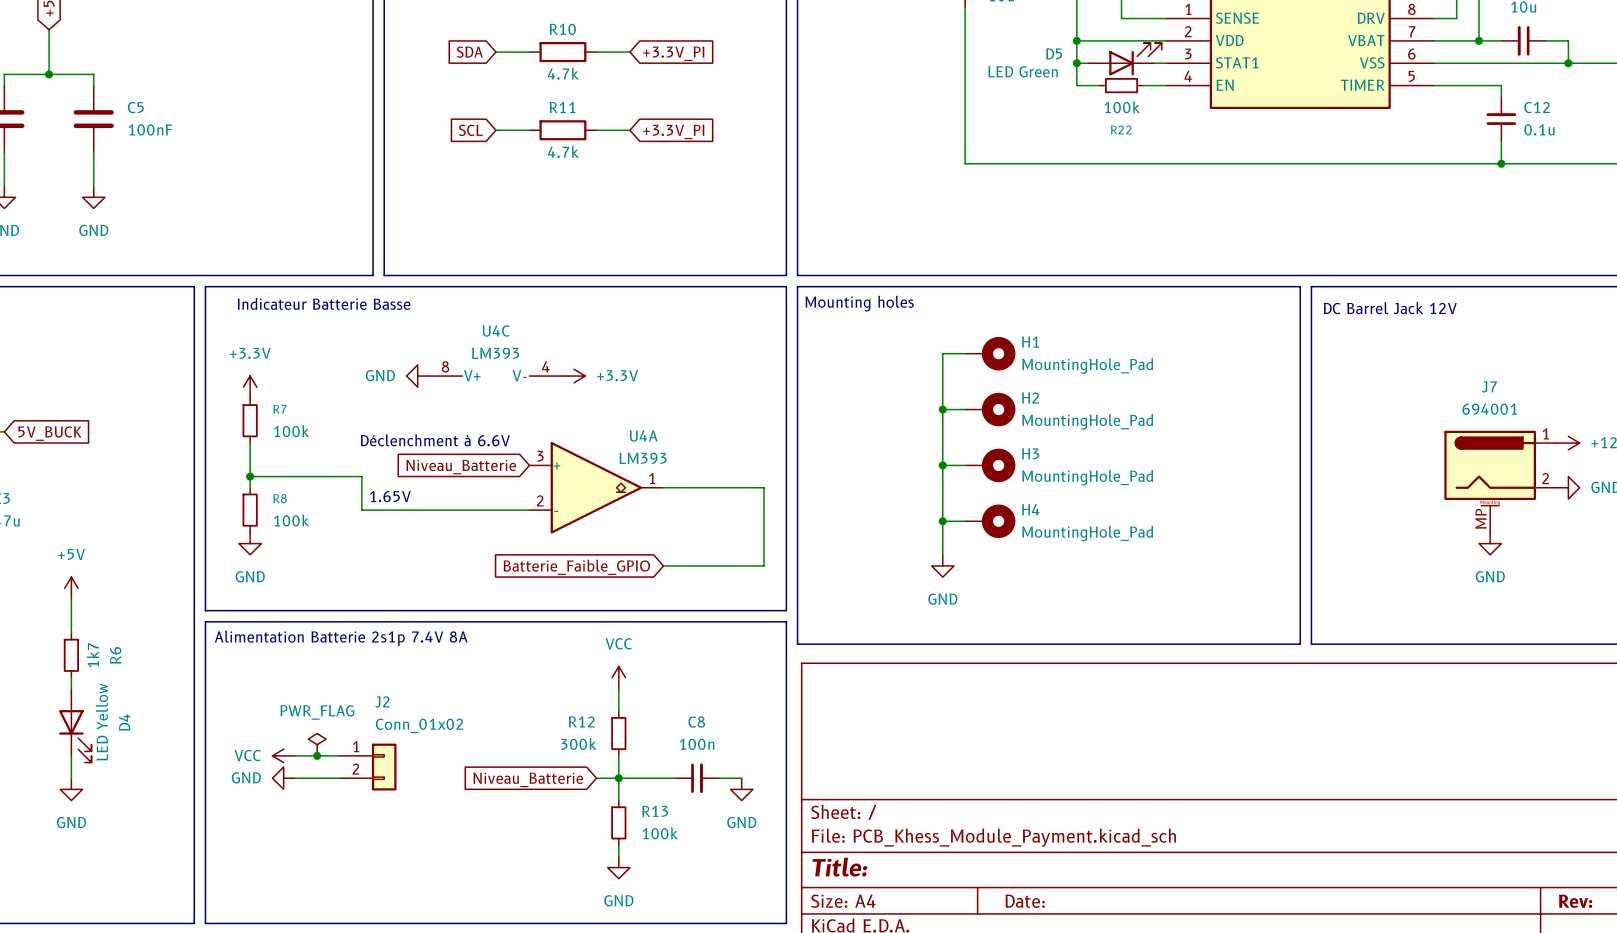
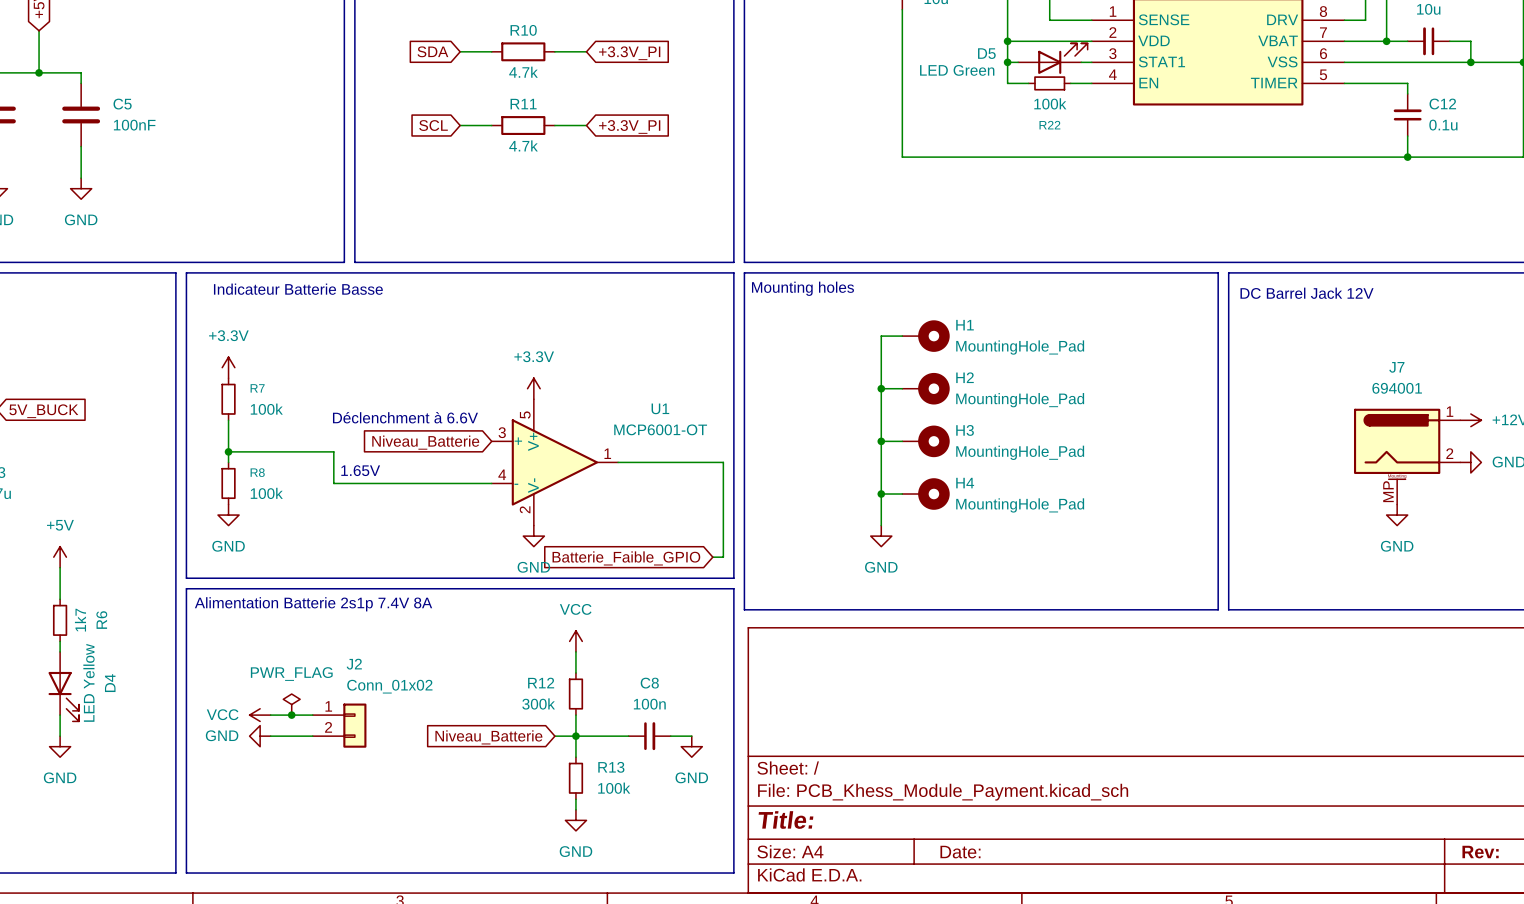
power symbol text position: +3.3V (617, 375) -> +3.3V (534, 356)
power symbol: GND (417, 376) -> none
U4C: LM393 (495, 376) -> none
power symbol rotation: 0° (574, 376) -> 90° counterclockwise (533, 388)
power symbol position: +3.3V (574, 376) -> +3.3V (533, 388)
U4A: LM393 (596, 487) -> none
U1: none -> MCP6001-OT (554, 462)
wire: (764, 487) (764, 565) (663, 565) -> (712, 462) (723, 462) (723, 557) (712, 557)
power symbol: none -> GND (533, 536)
global label position: Batterie_Faible_GPIO (576, 567) -> Batterie_Faible_GPIO (626, 558)

